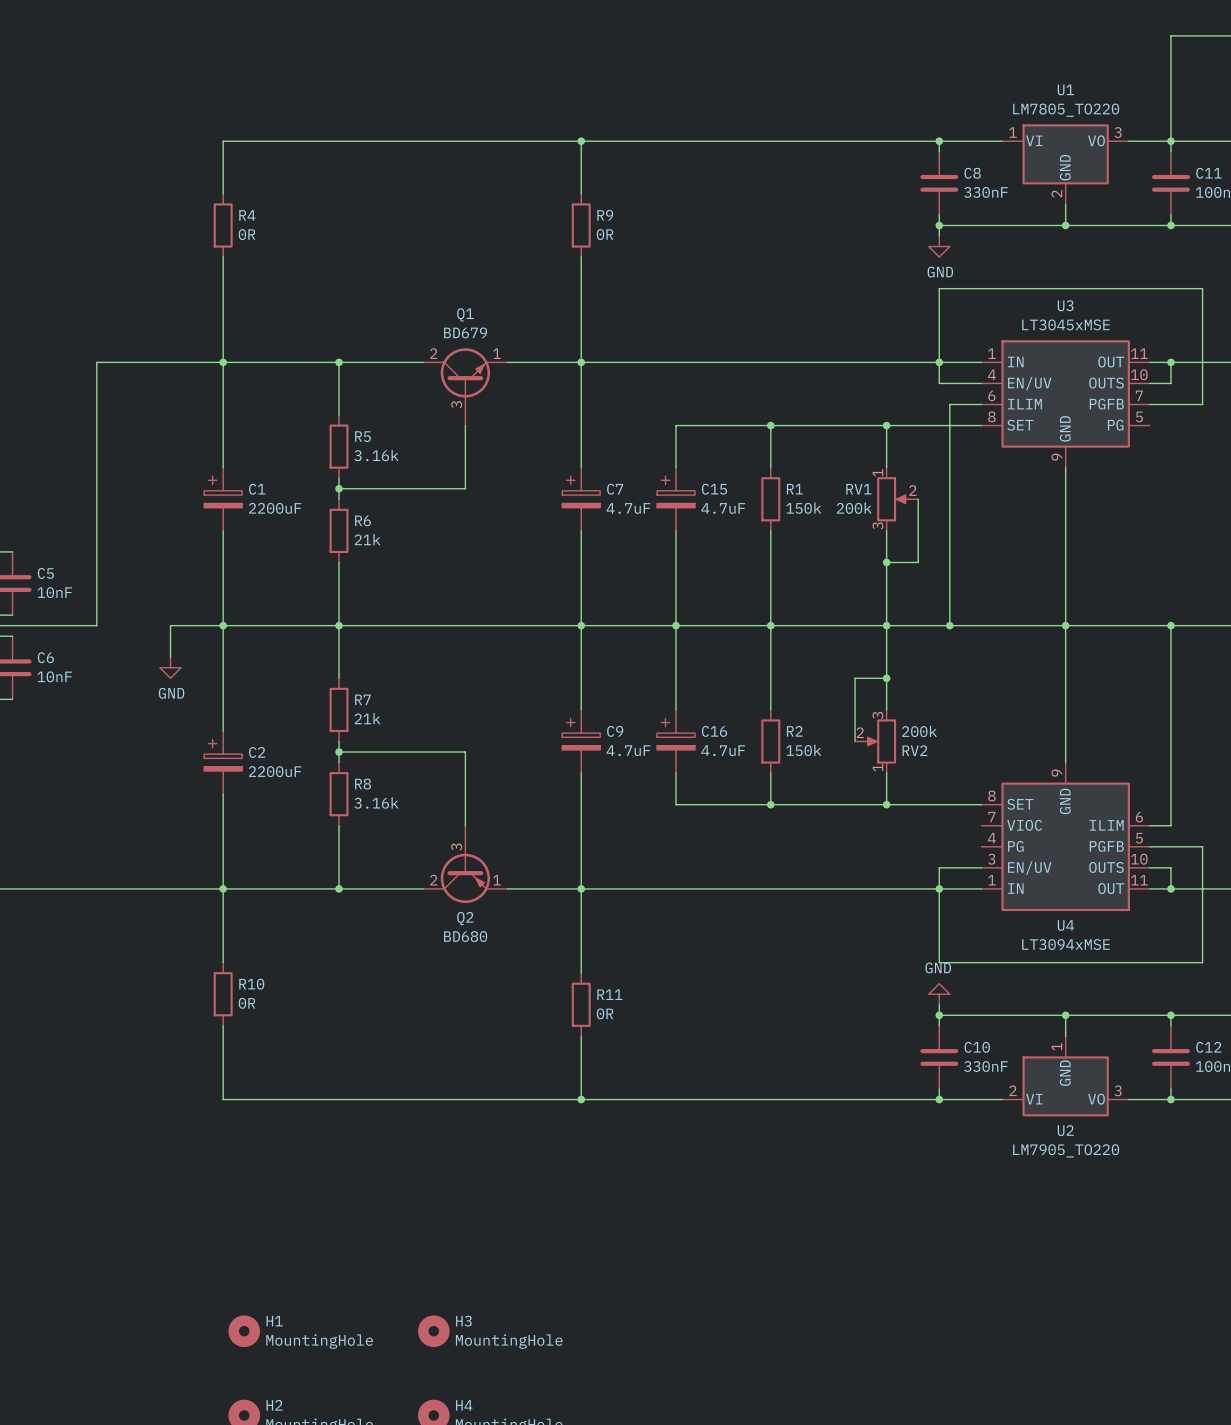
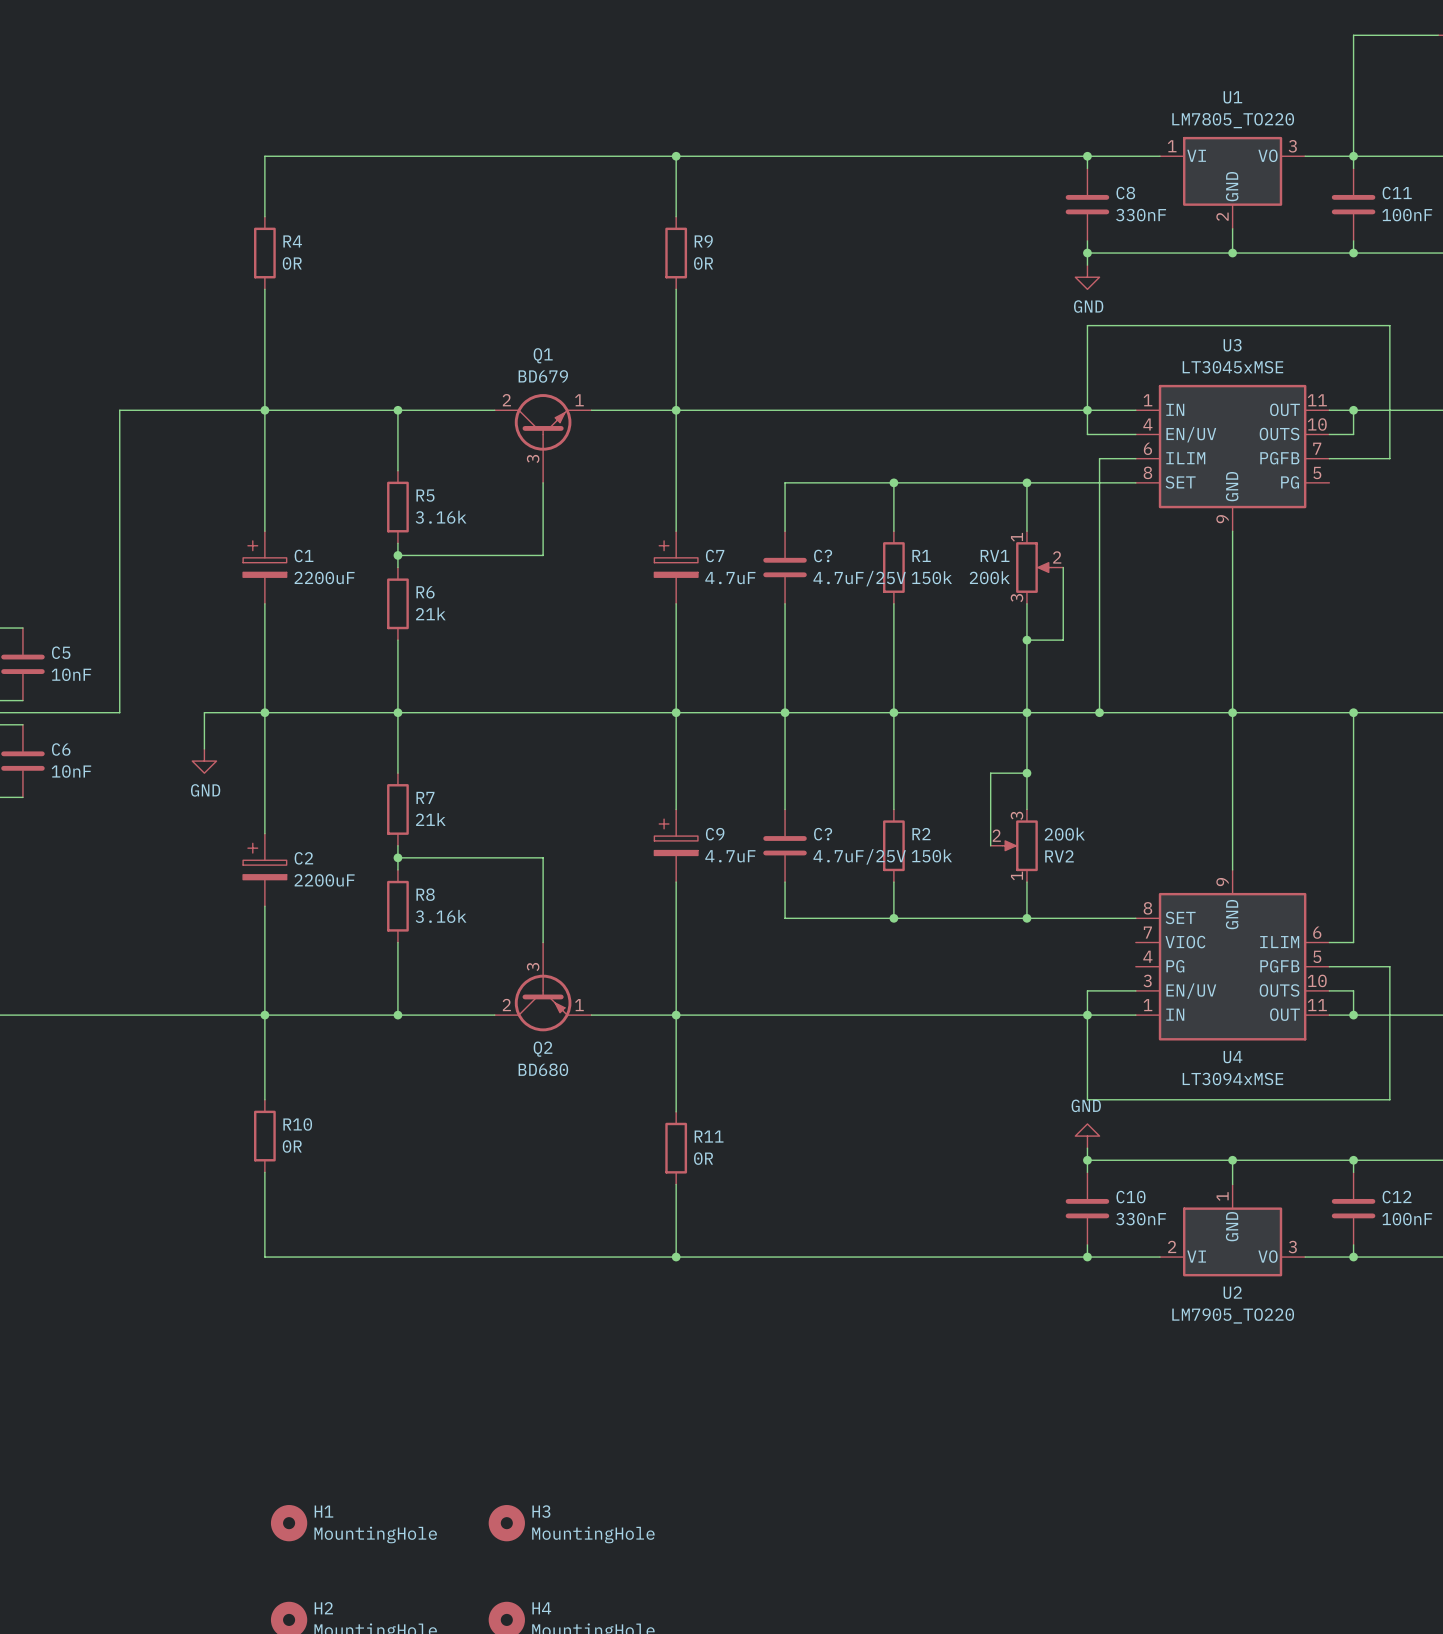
C15: 4.7uF (676, 499) -> none
C?: none -> 4.7uF/25V (785, 567)
C16: 4.7uF (676, 741) -> none
C?: none -> 4.7uF/25V (785, 845)

